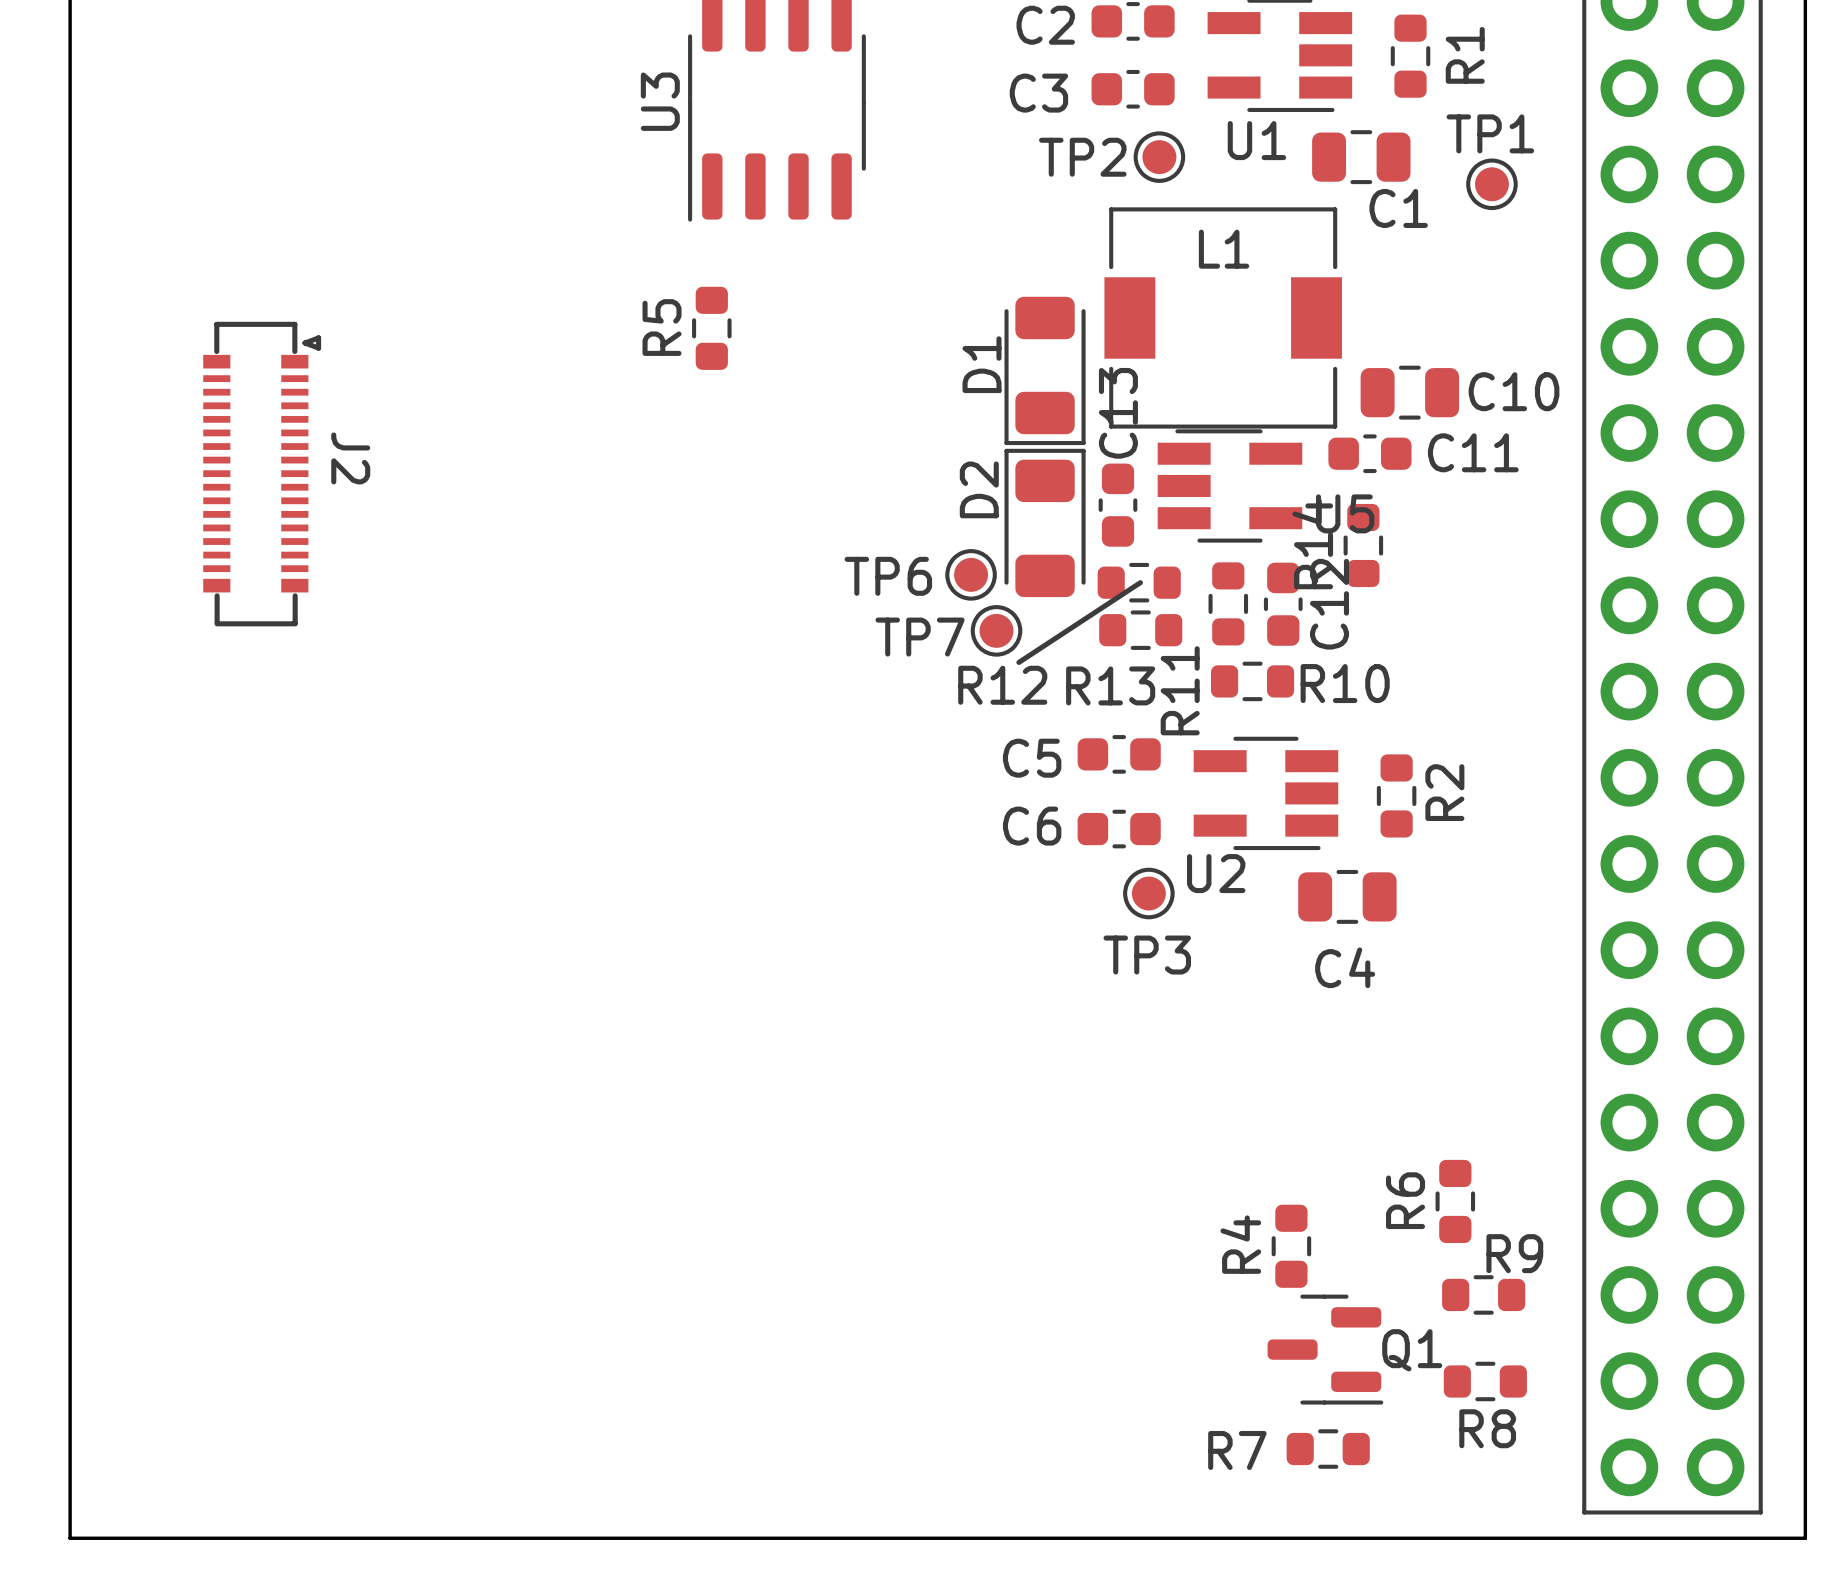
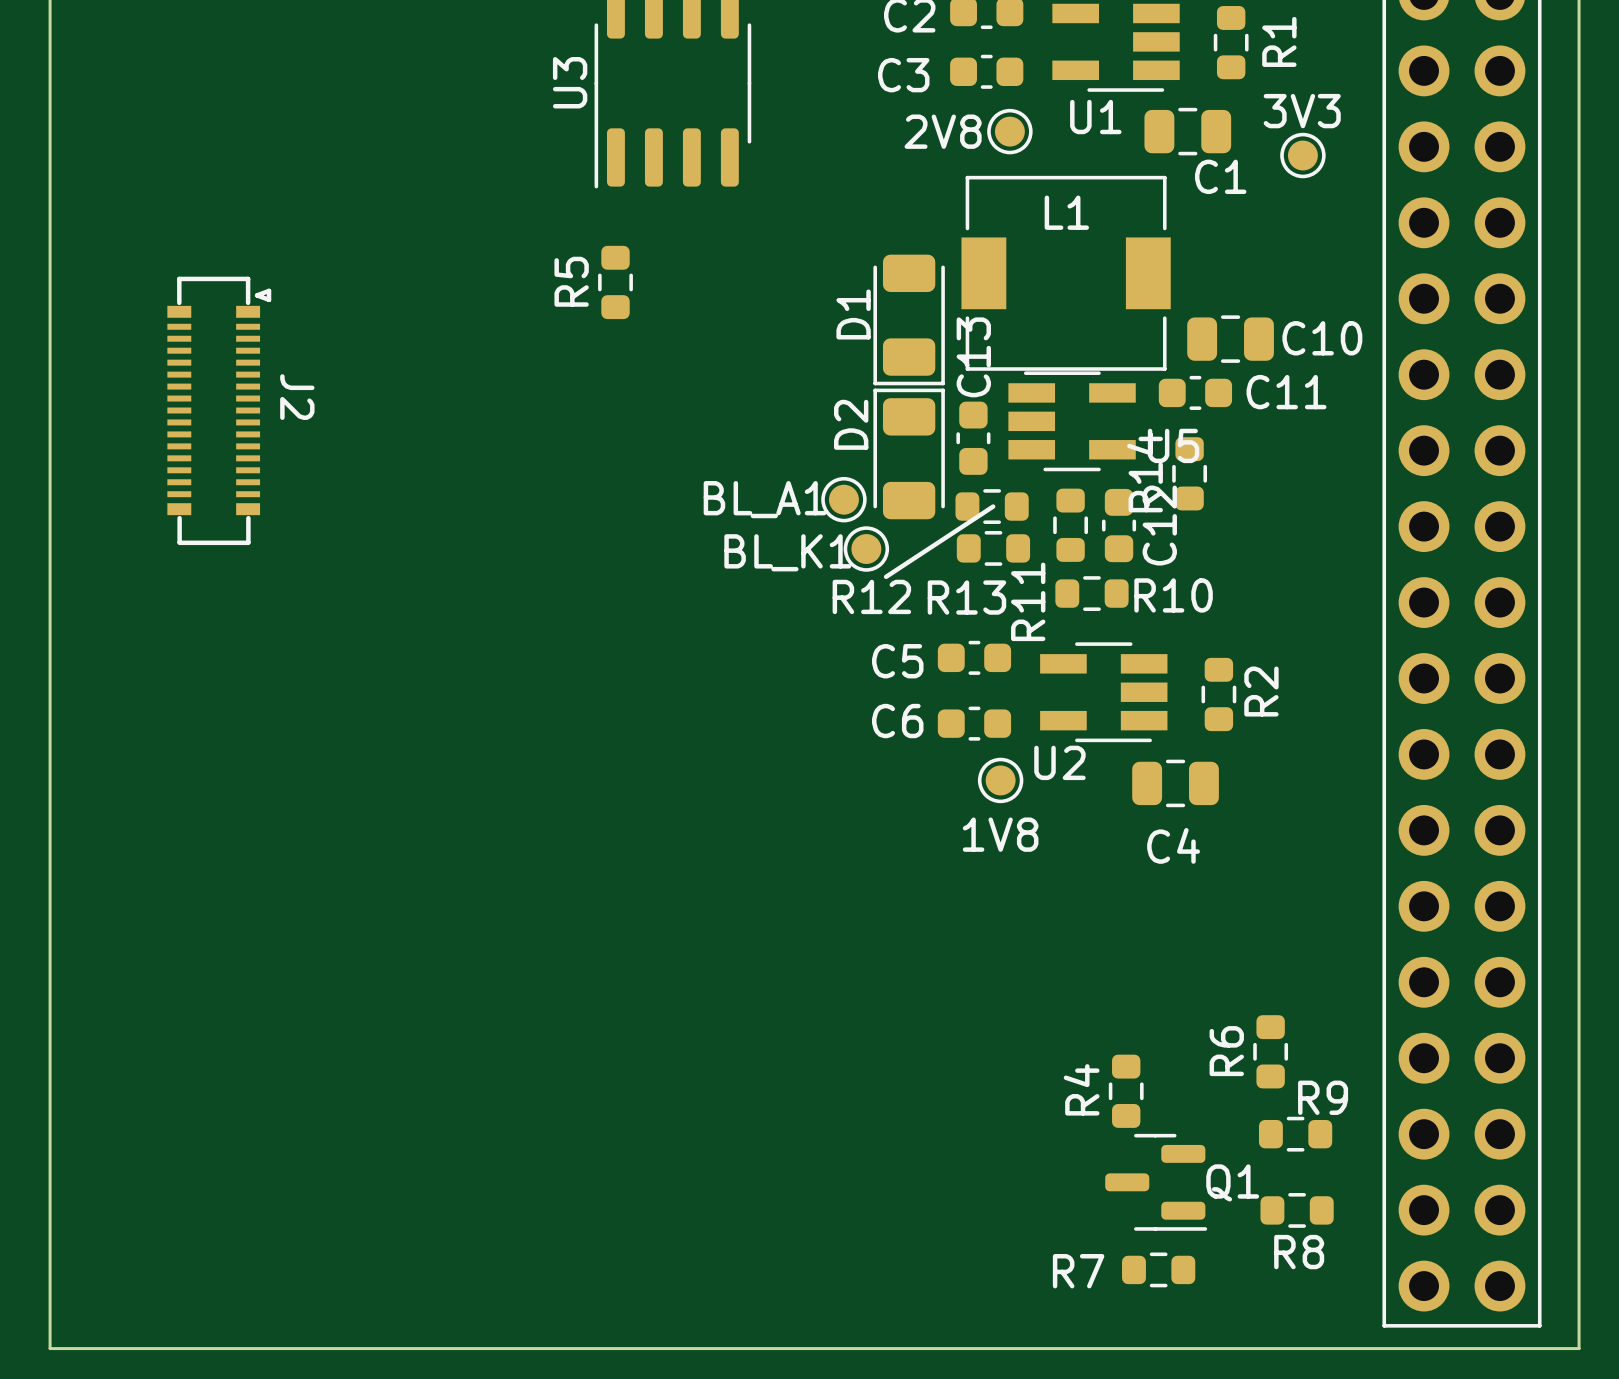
TP1 name: TP1 (1490, 133) -> 3V3 (1302, 111)
TP2 name: TP2 (1082, 157) -> 2V8 (943, 131)
TP6 name: TP6 (888, 576) -> BL_A1 (765, 499)
TP7 name: TP7 (920, 637) -> BL_K1 (787, 552)
TP3 name: TP3 (1147, 955) -> 1V8 (1000, 834)

